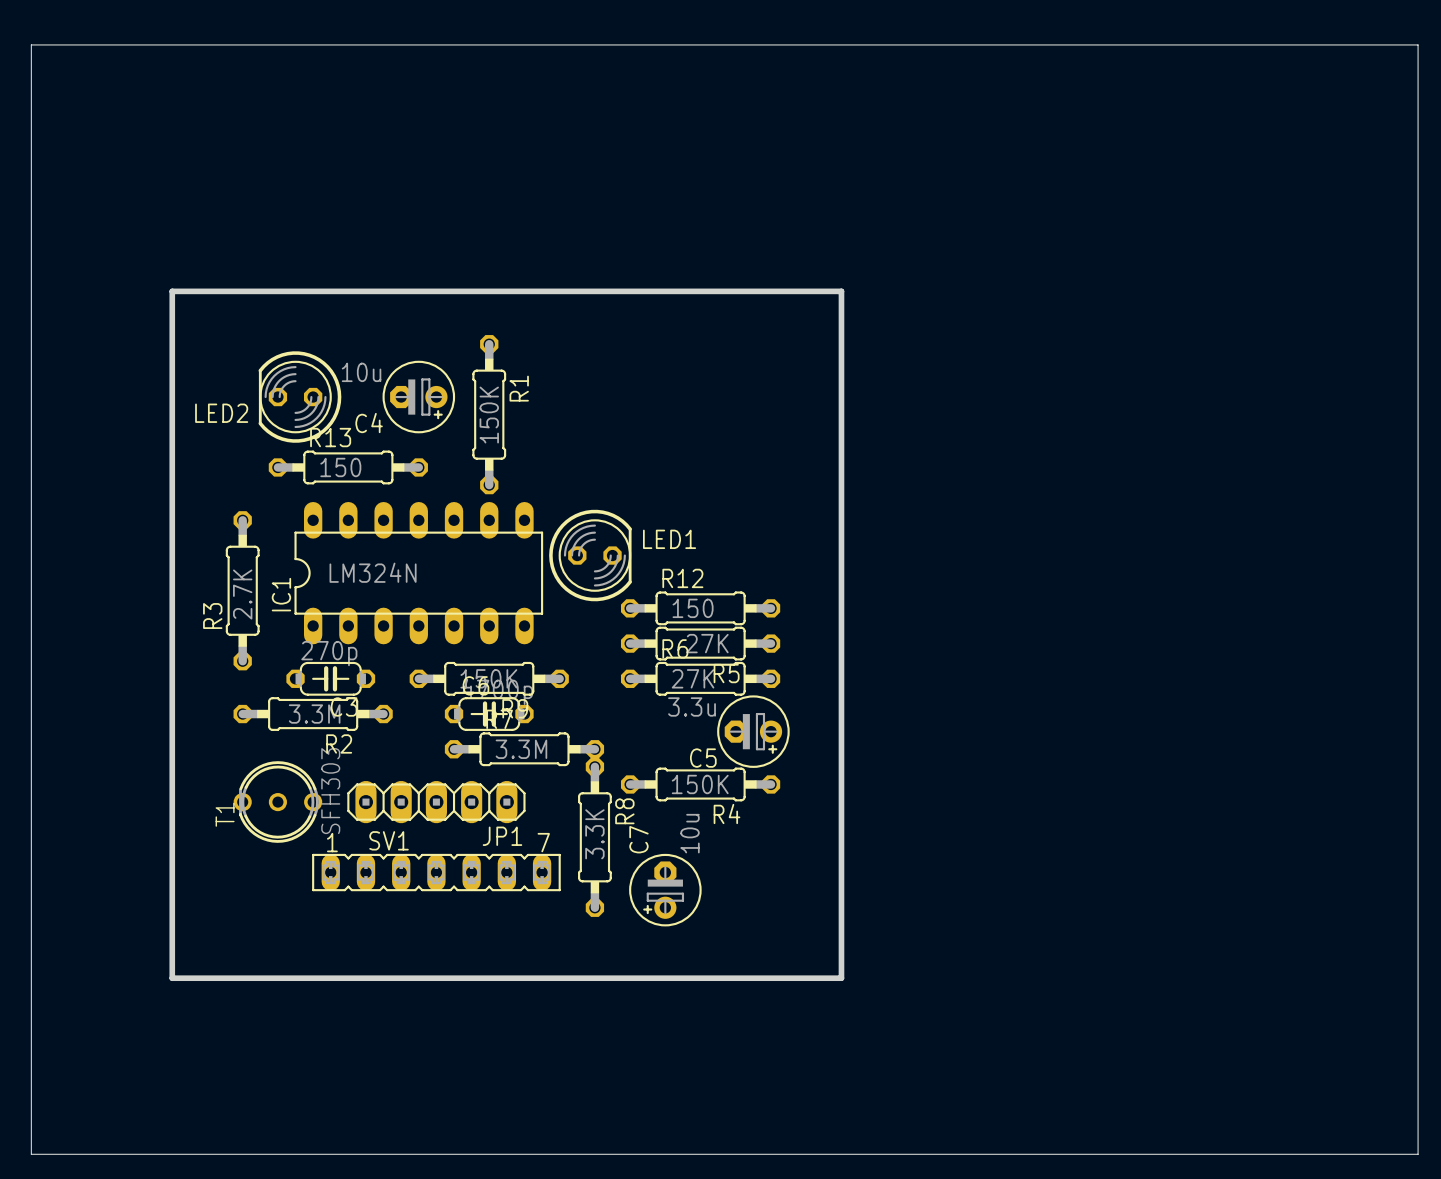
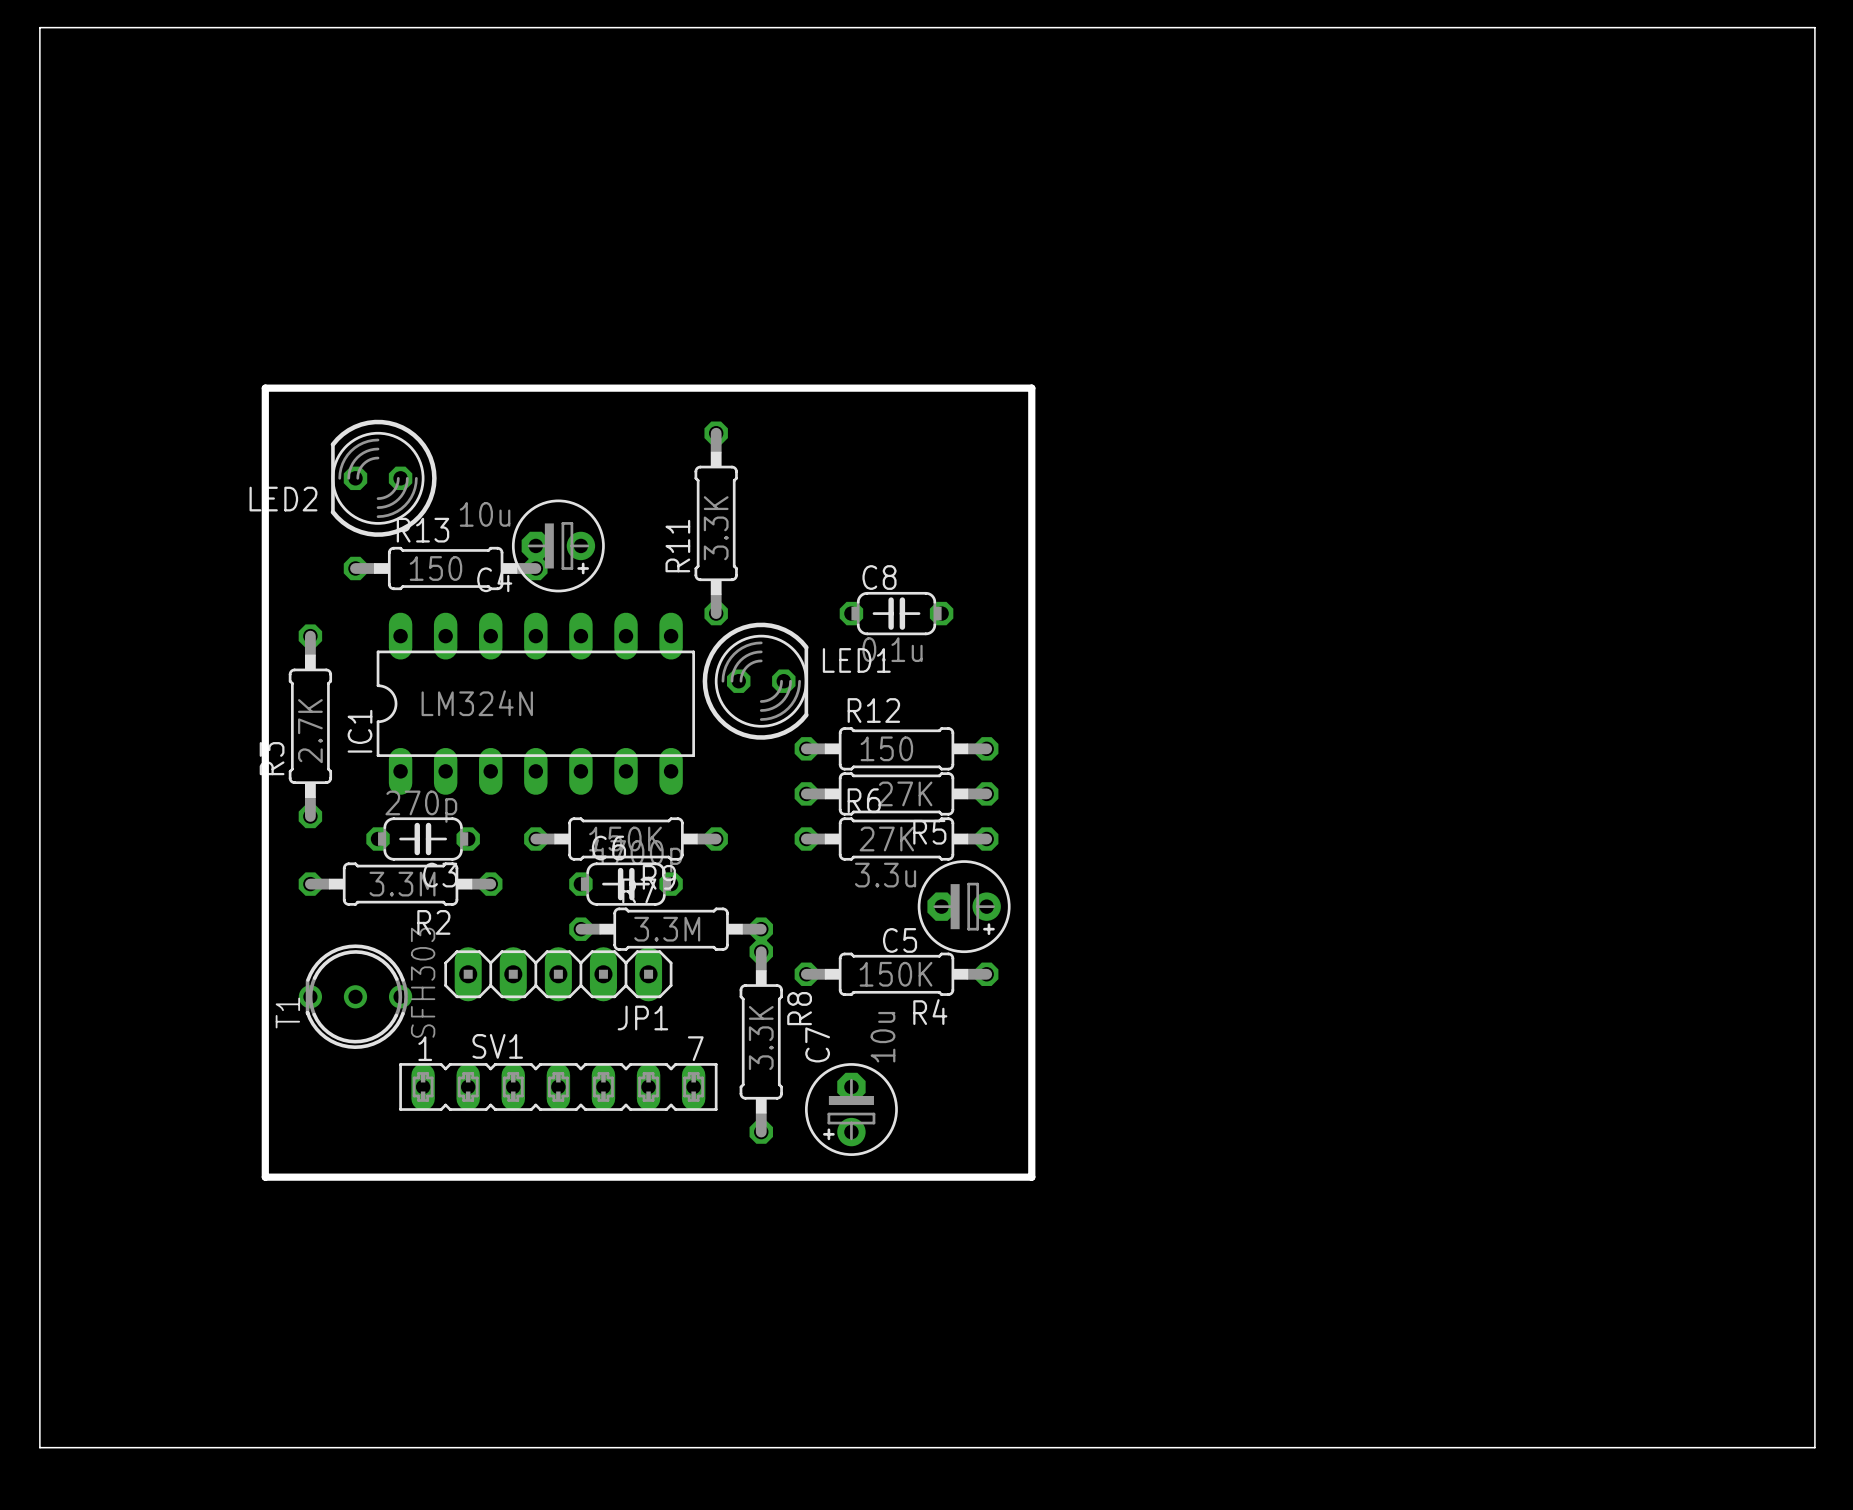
board edge: (172, 291) (841, 291) (841, 978) (172, 978) (172, 291) -> (265, 388) (265, 1177) (1031, 1177) (1031, 388) (265, 388)
C4 position: (418, 397) -> (558, 545)
R1: 150K (489, 414) -> none
R11: none -> 3.3K (716, 523)
C8: none -> 0.1u (896, 613)
JP1 position: (436, 802) -> (558, 974)

